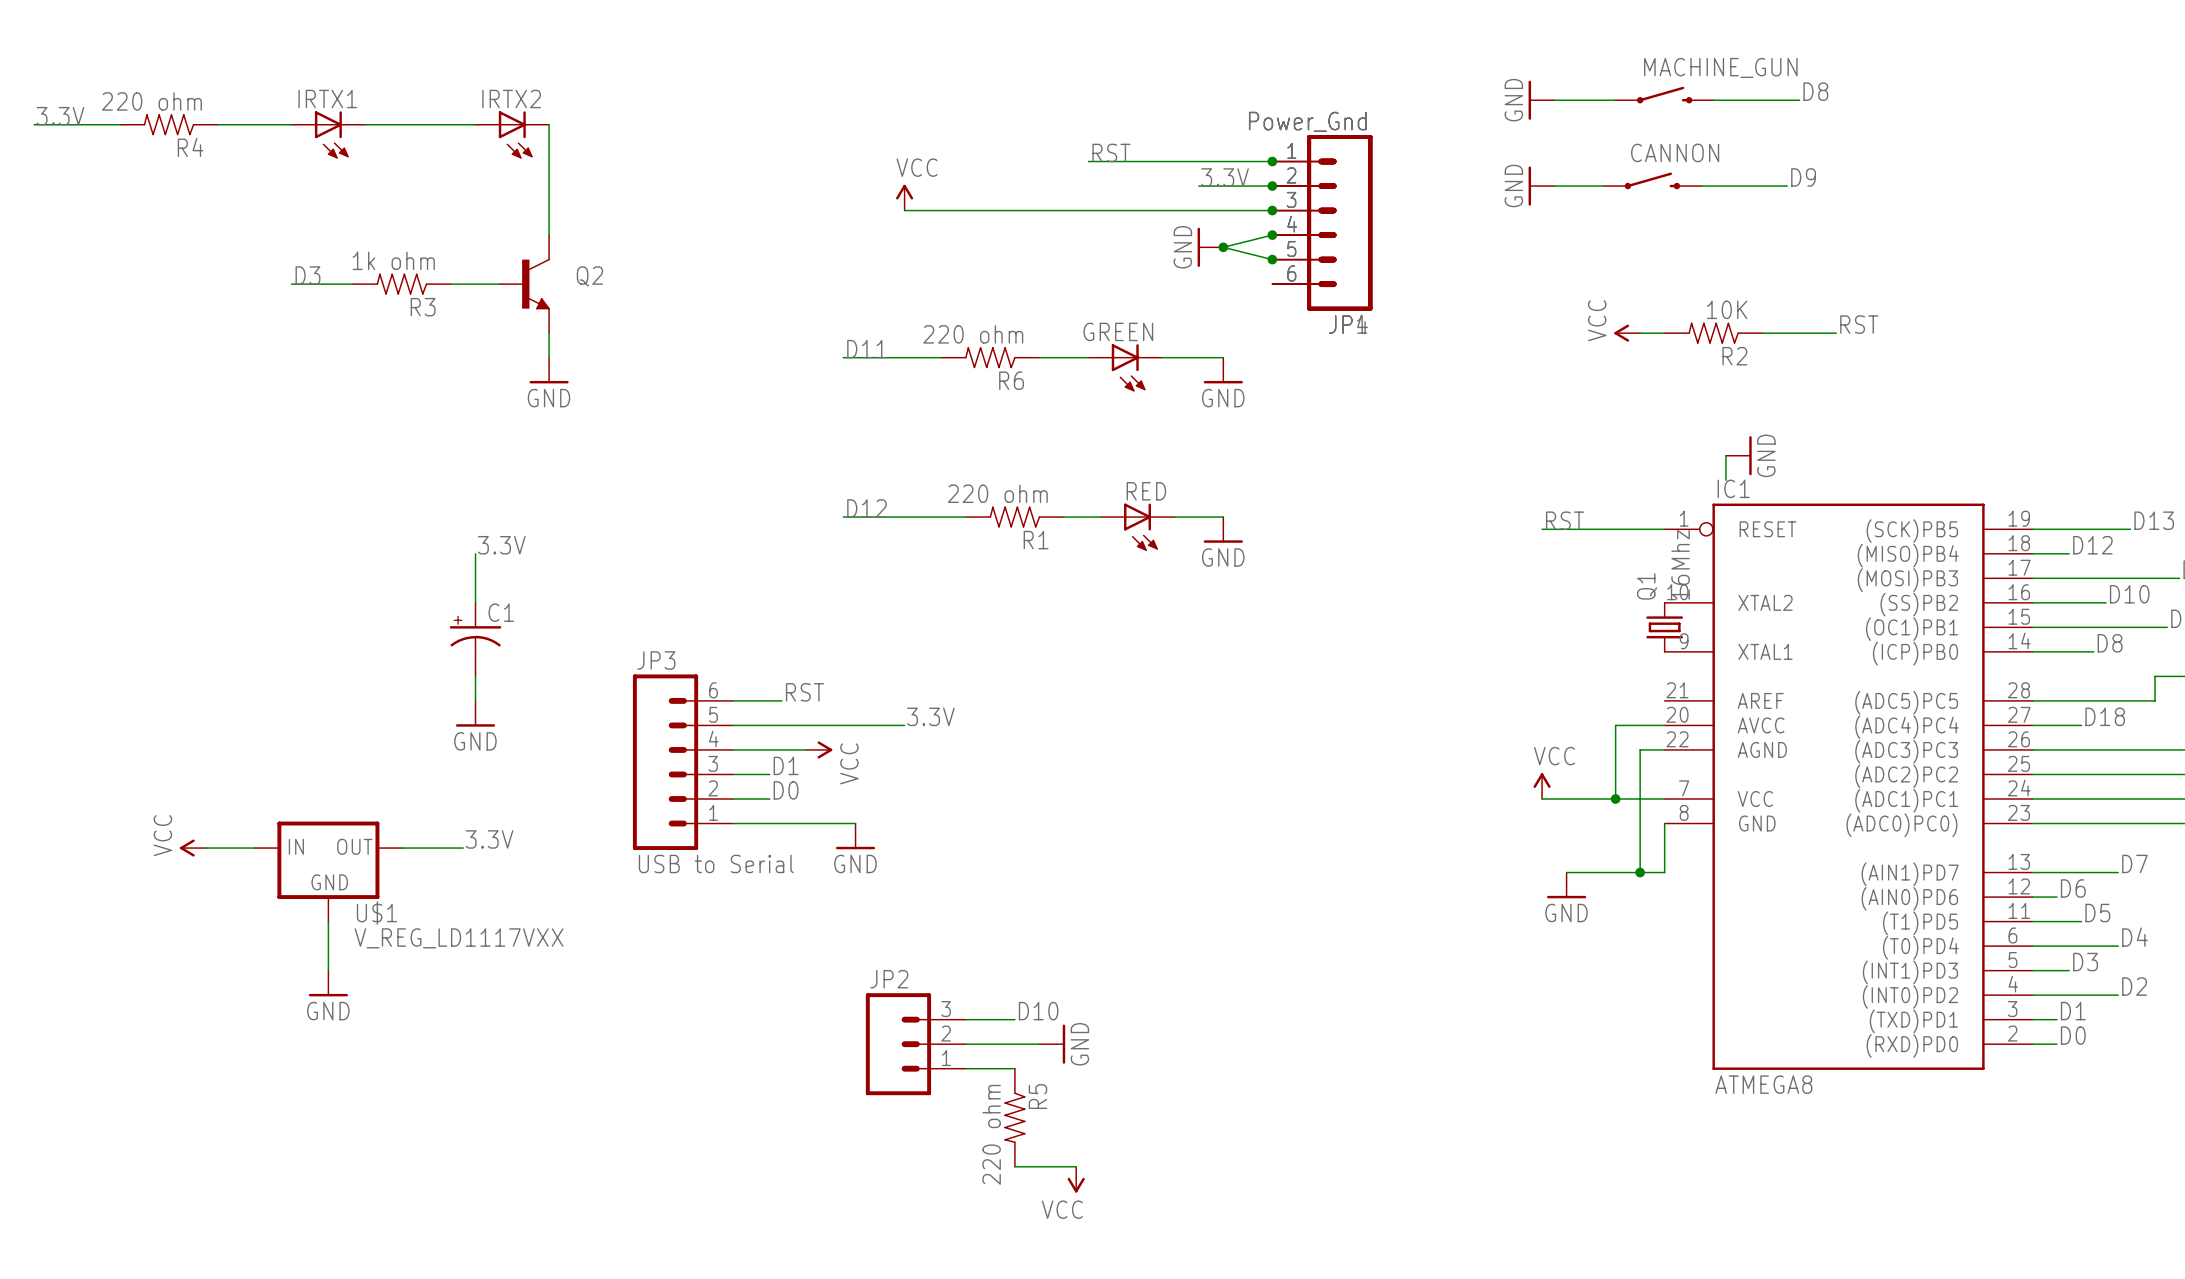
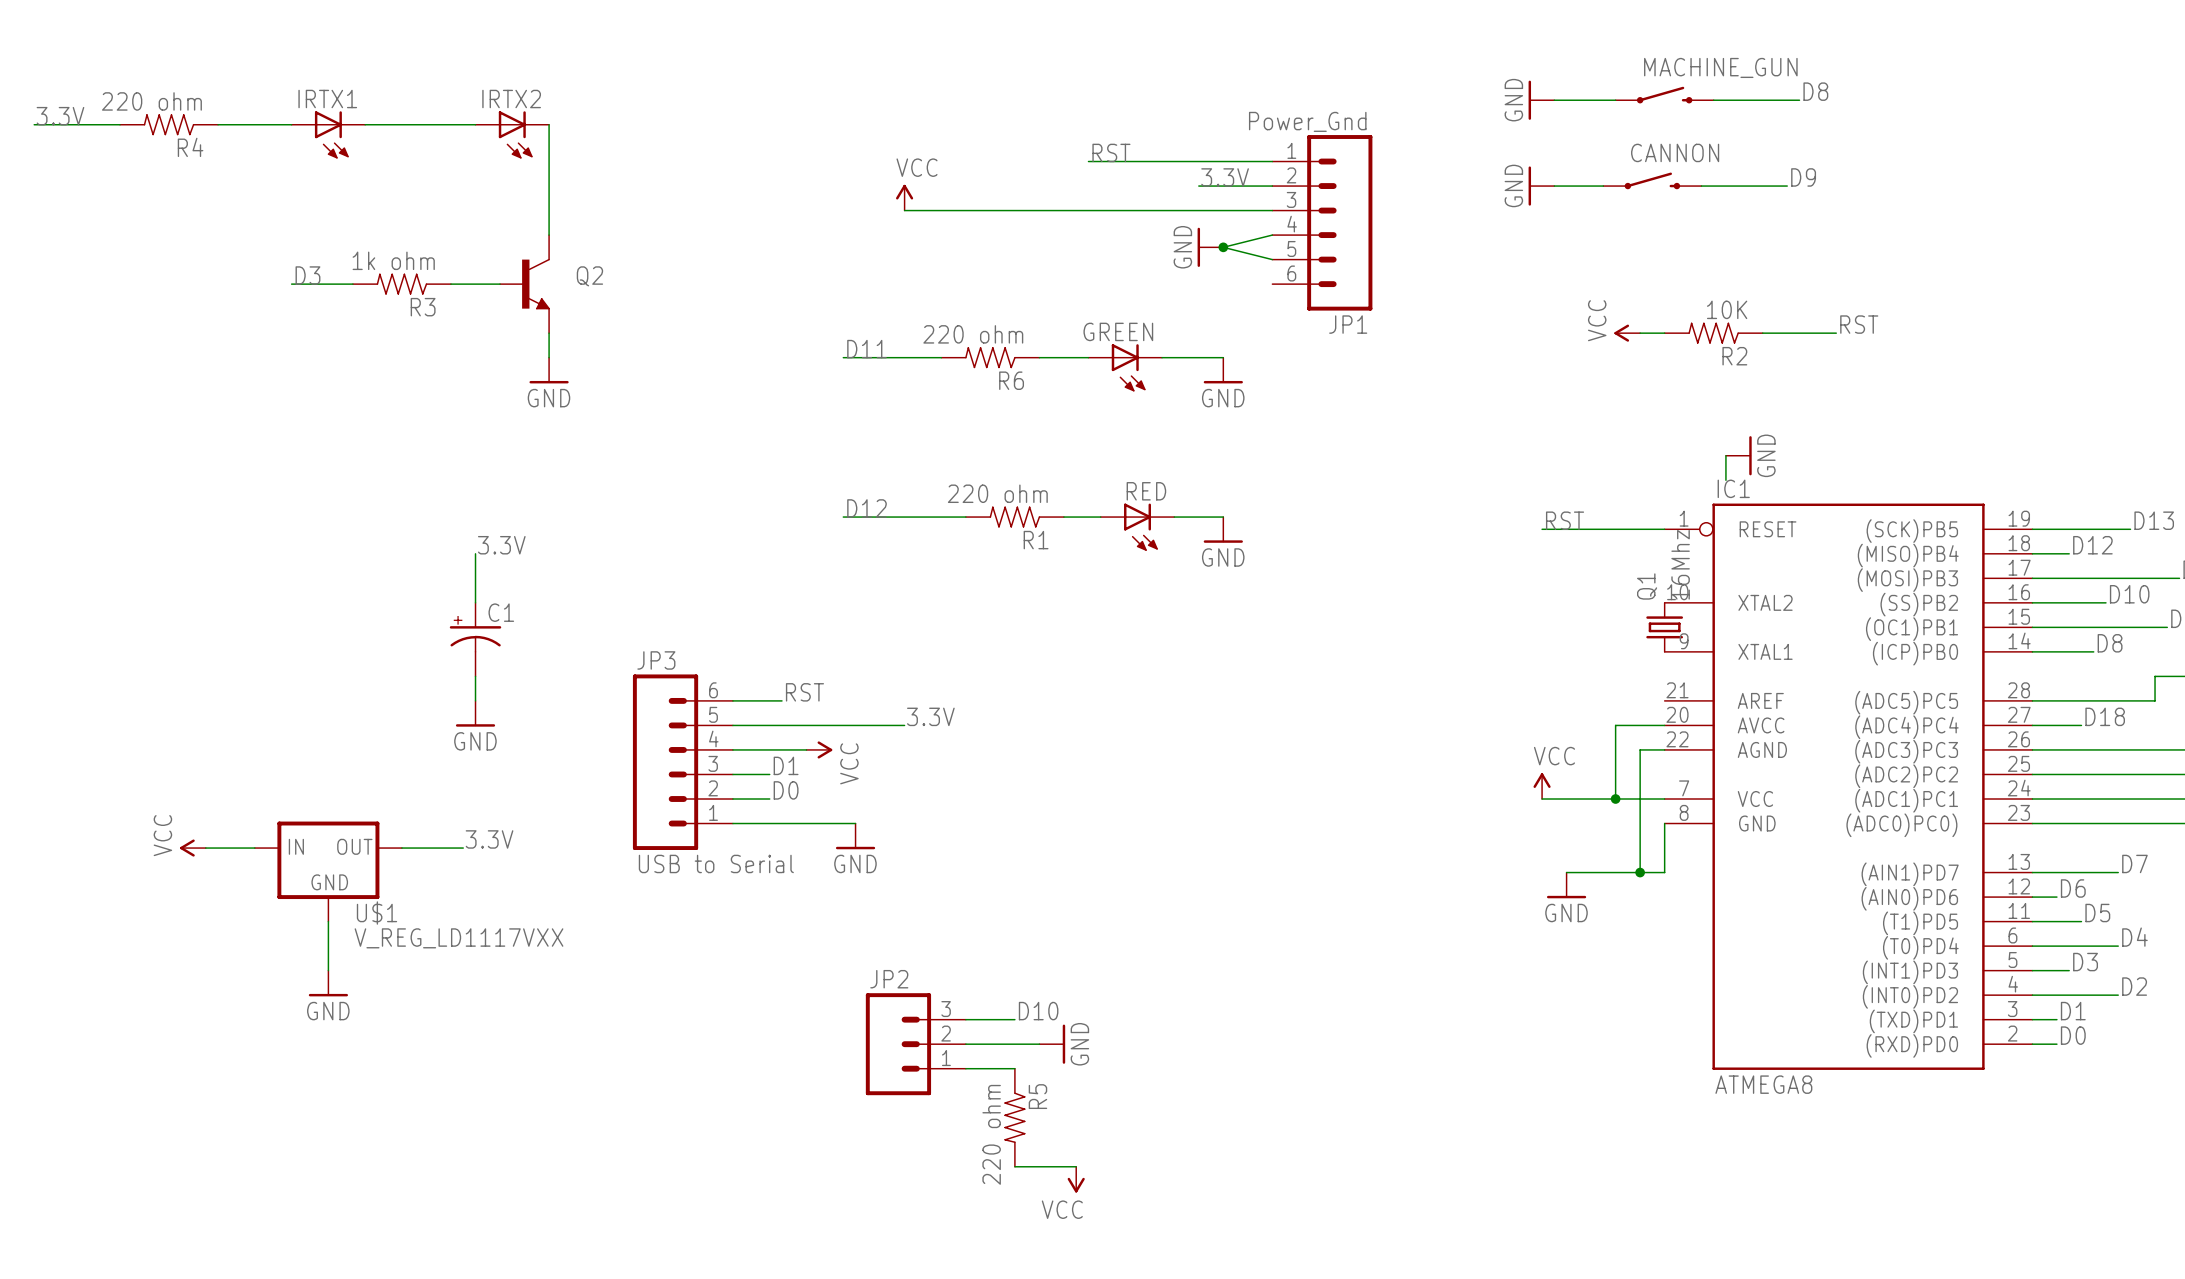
junction: (1272, 161) -> none
junction: (1272, 186) -> none
junction: (1272, 210) -> none
part: Power_Gnd (1322, 222) -> none
junction: (1272, 235) -> none
junction: (1272, 259) -> none

